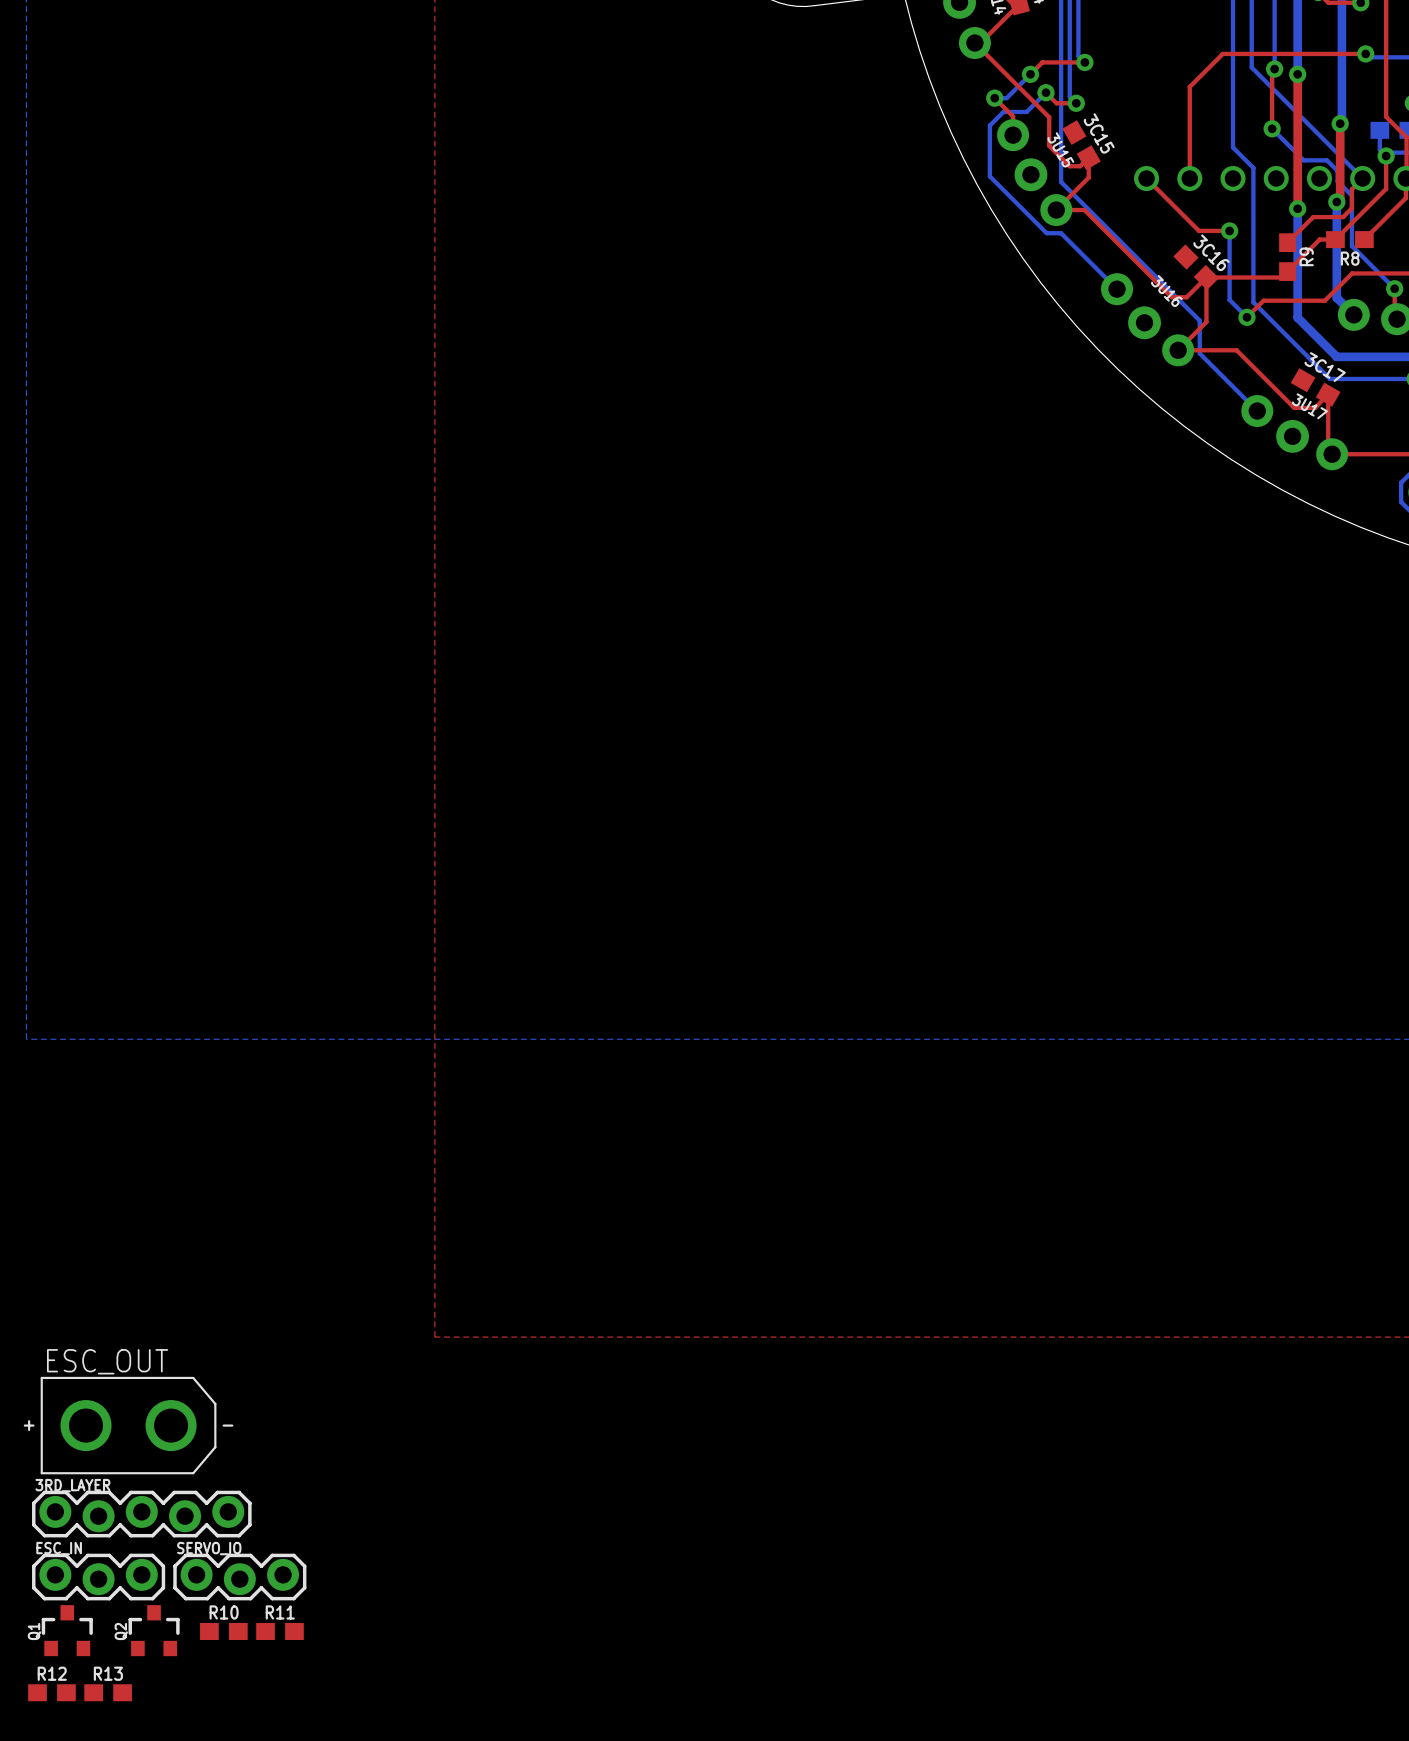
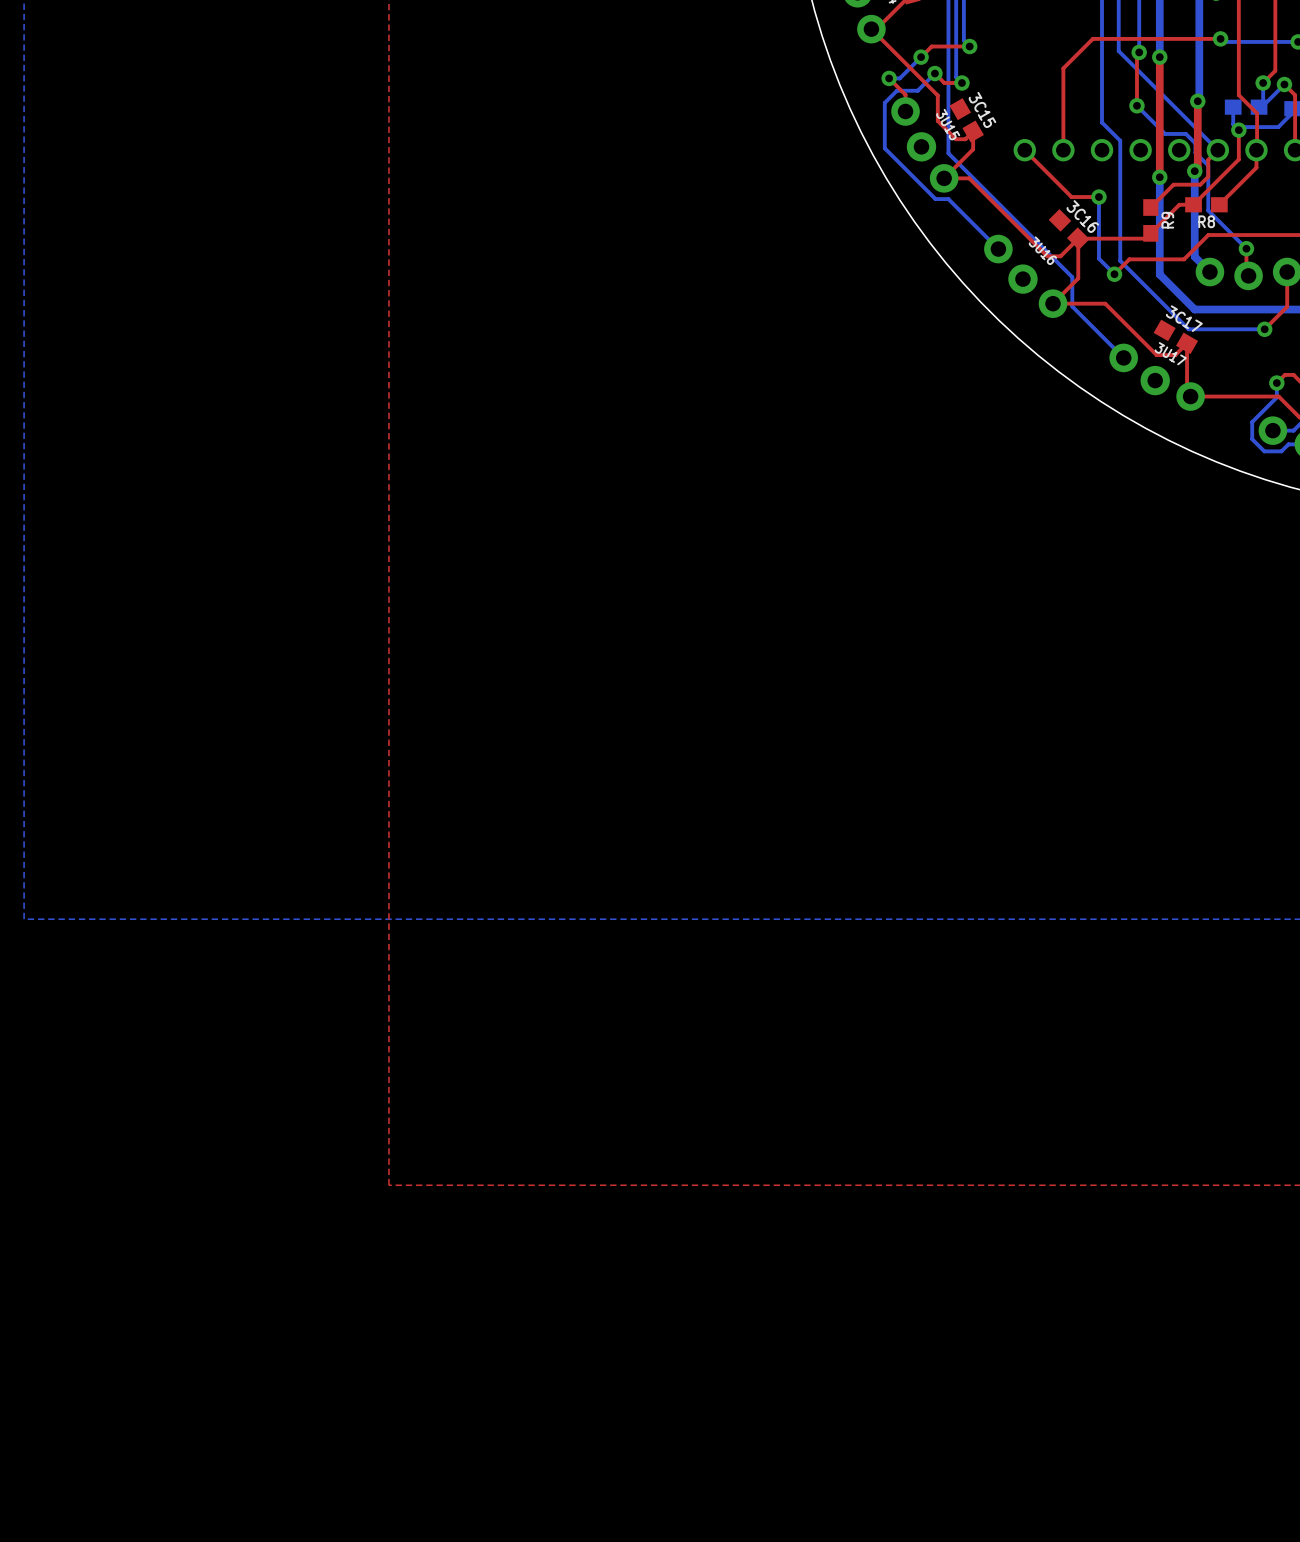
ESC_OUT: (128, 1425) -> none
3RD_LAYER: (141, 1514) -> none
ESC_IN: (98, 1577) -> none
SERVO_IO: (239, 1577) -> none
Q1: (67, 1630) -> none
Q2: (154, 1630) -> none
R10: (223, 1631) -> none
R11: (280, 1631) -> none
R12: (51, 1692) -> none
R13: (108, 1692) -> none

